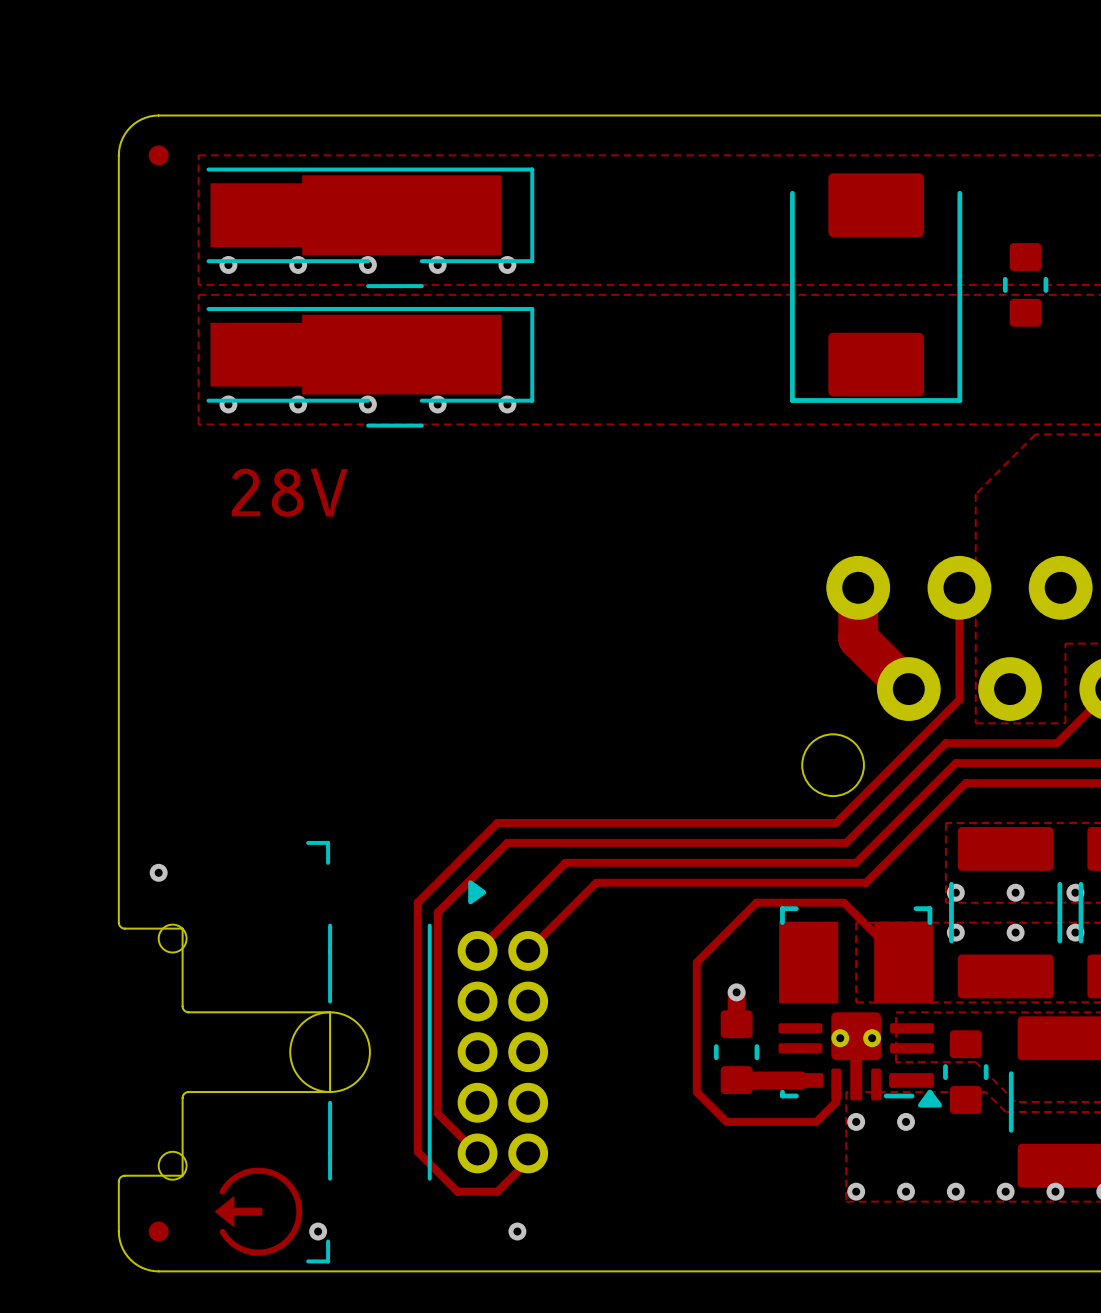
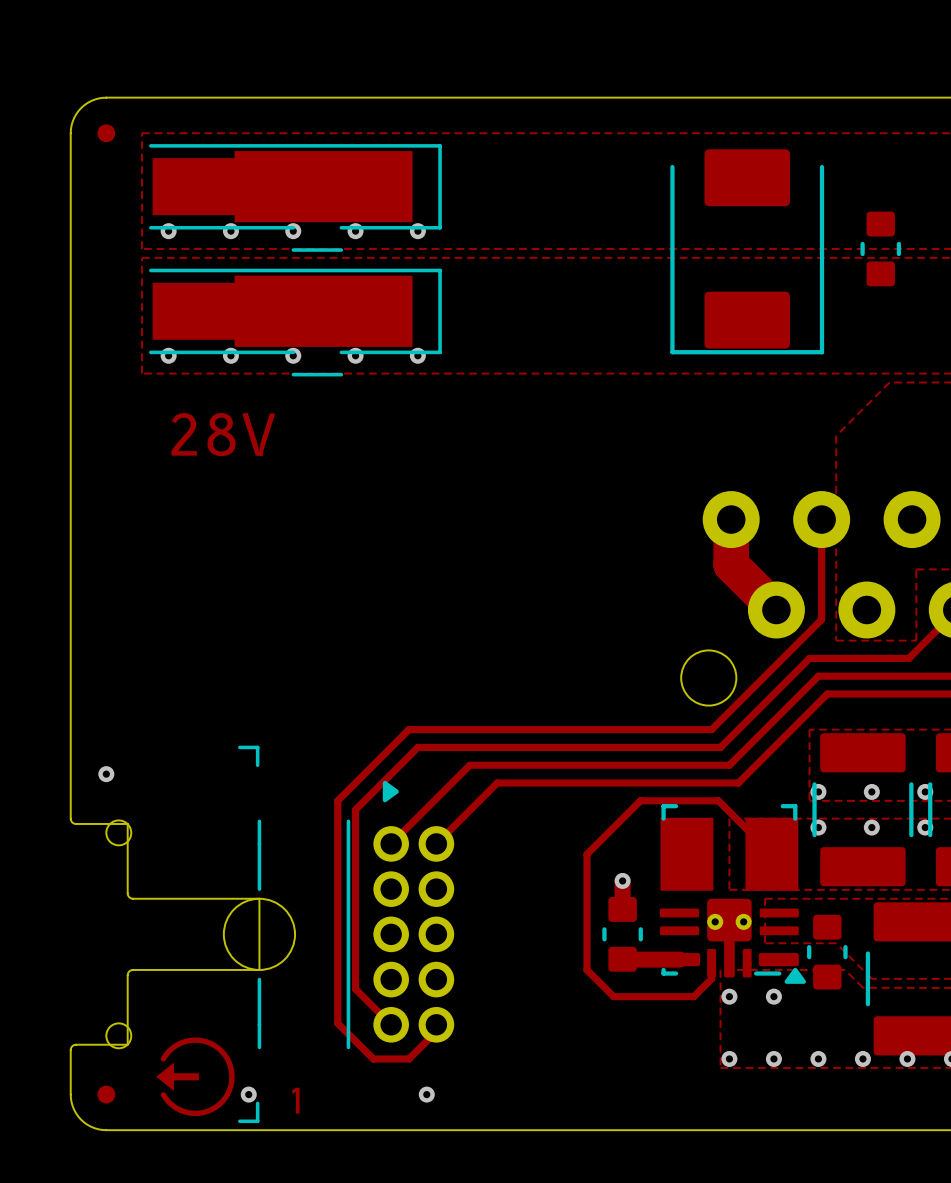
drawing: none -> [292, 1087, 300, 1114]

